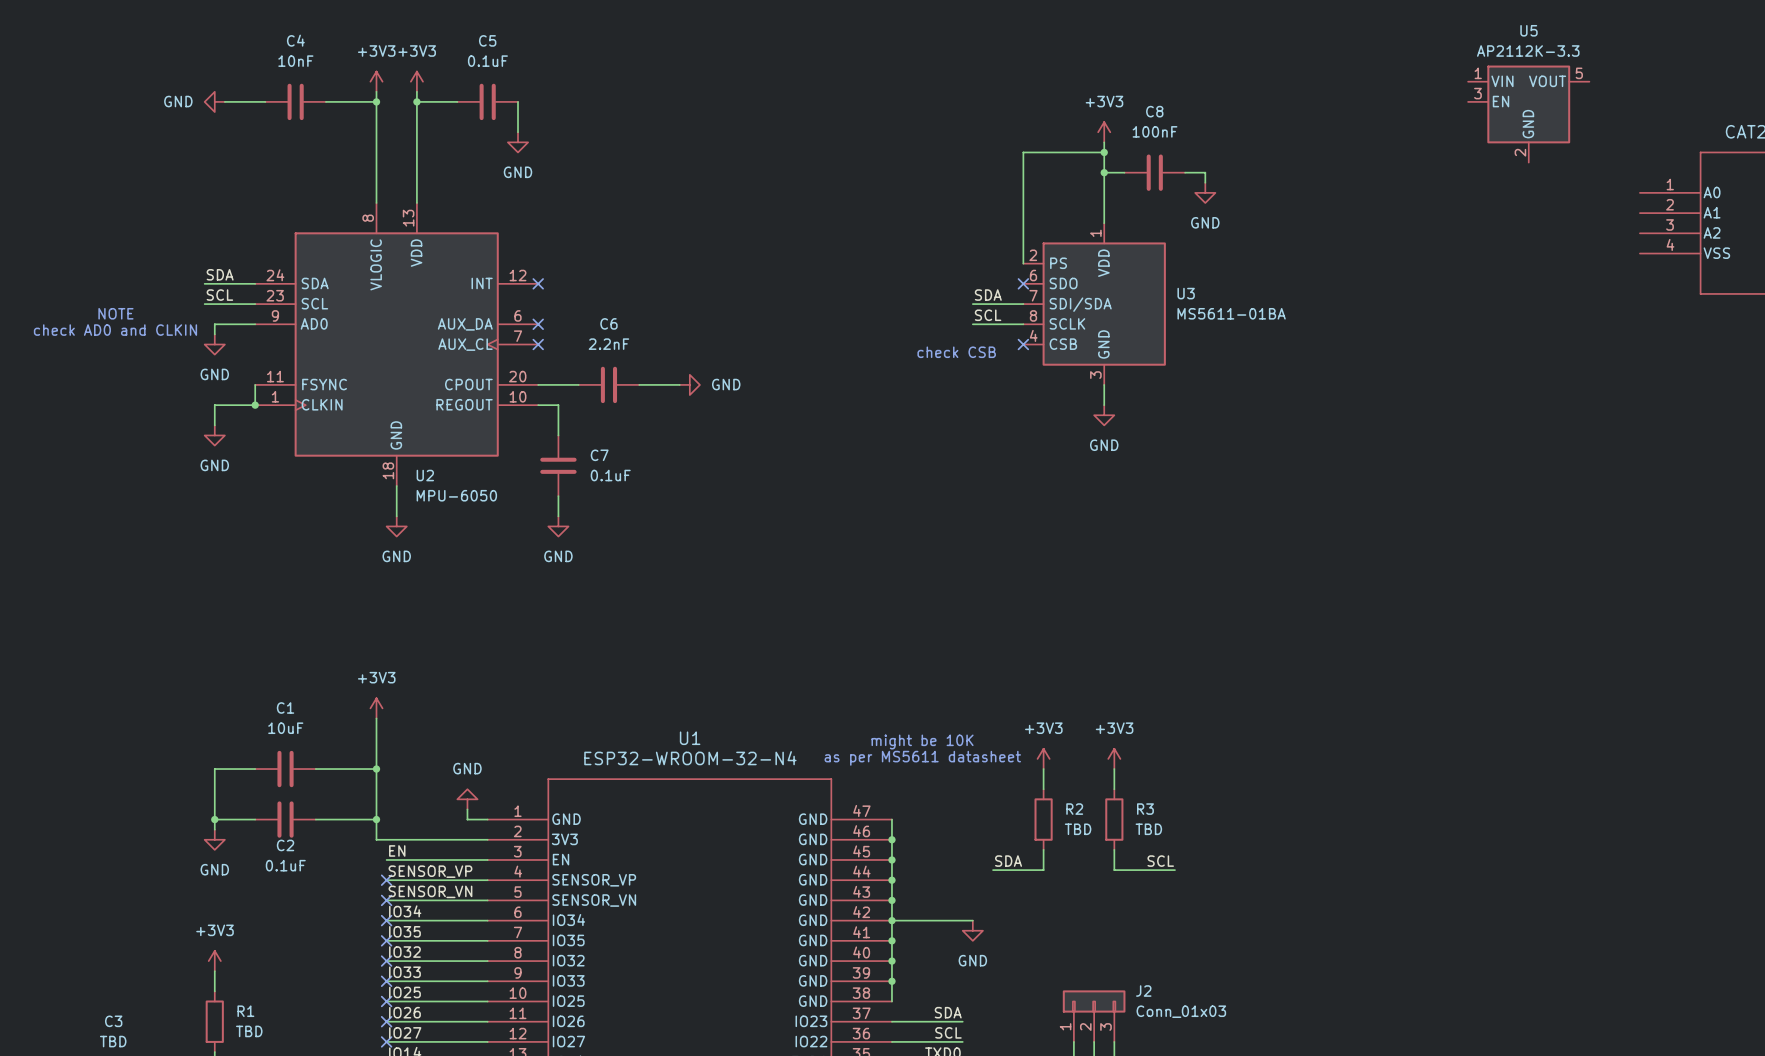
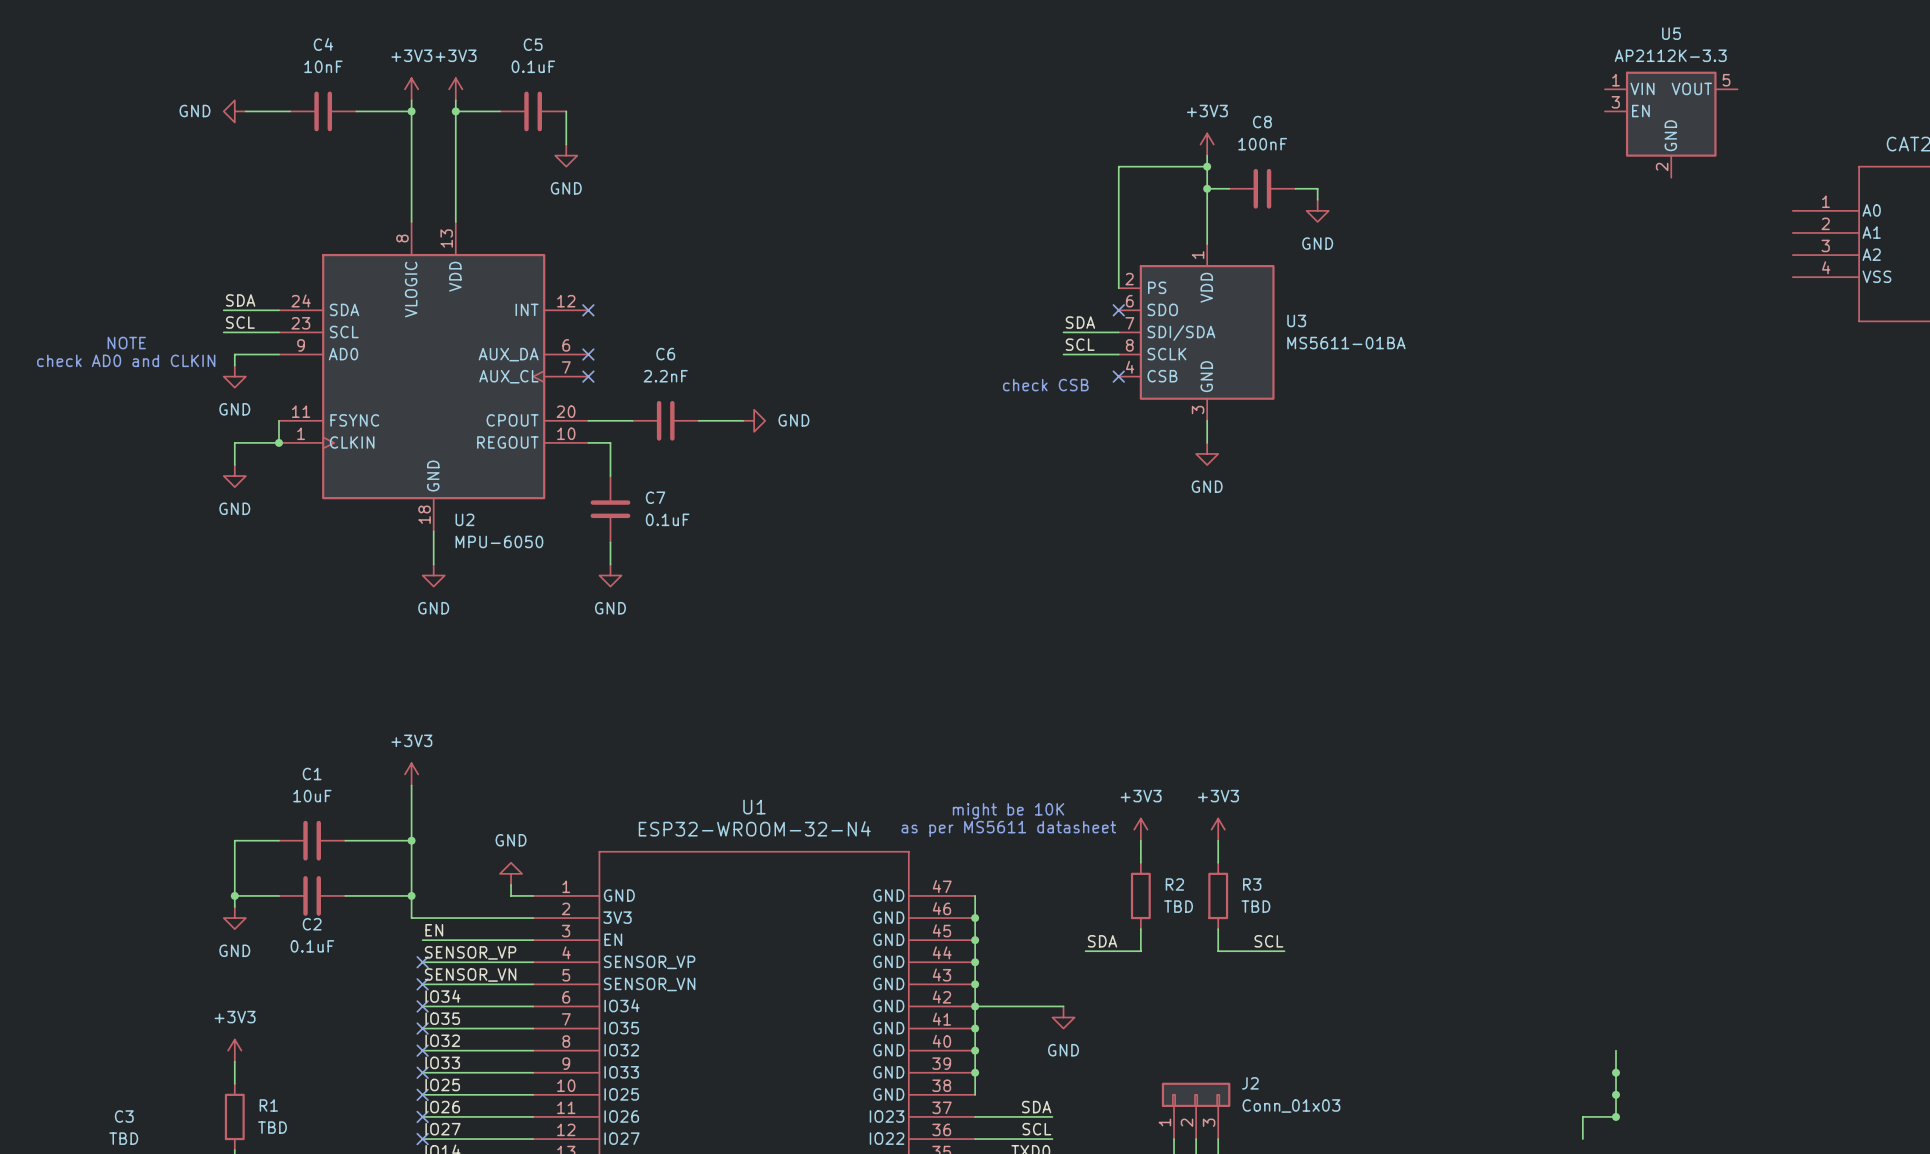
wire: none -> (1616, 1050) (1616, 1116) (1582, 1116) (1582, 1139)
junction: none -> (1616, 1072)
junction: none -> (1616, 1094)
junction: none -> (1616, 1116)

